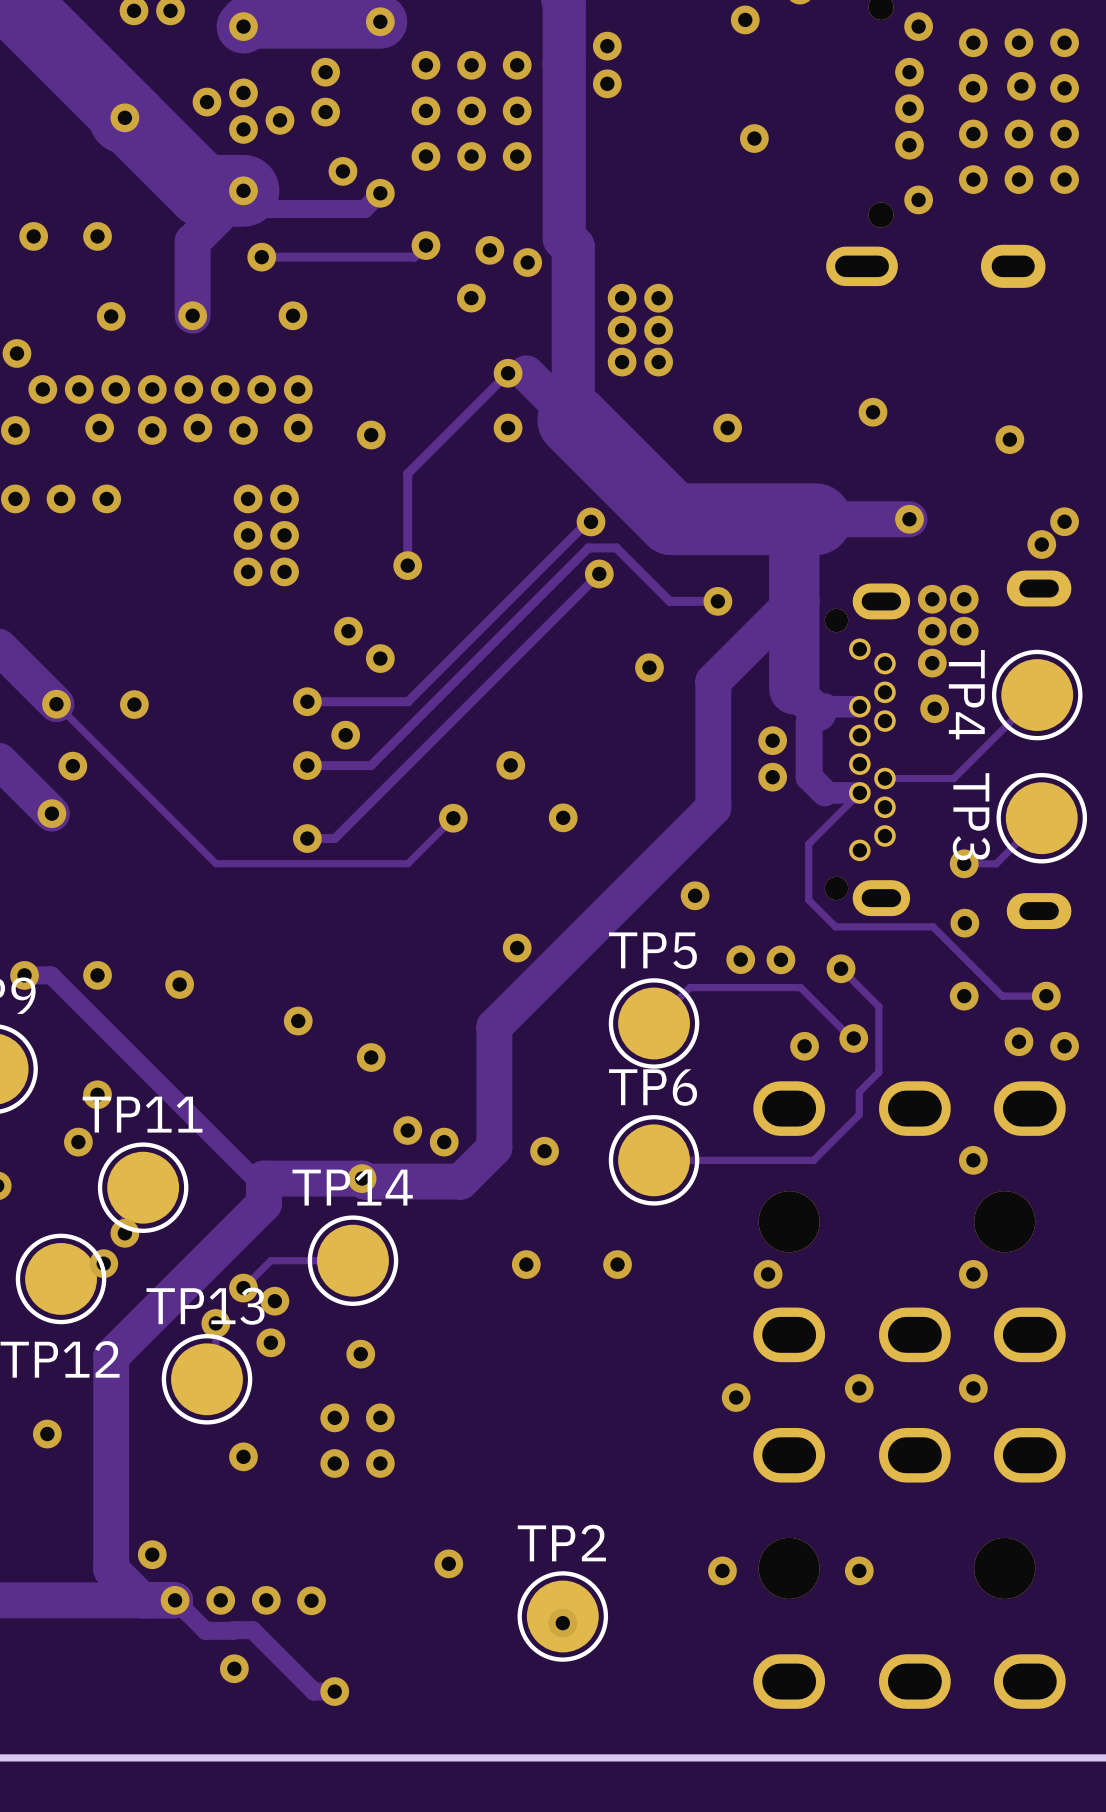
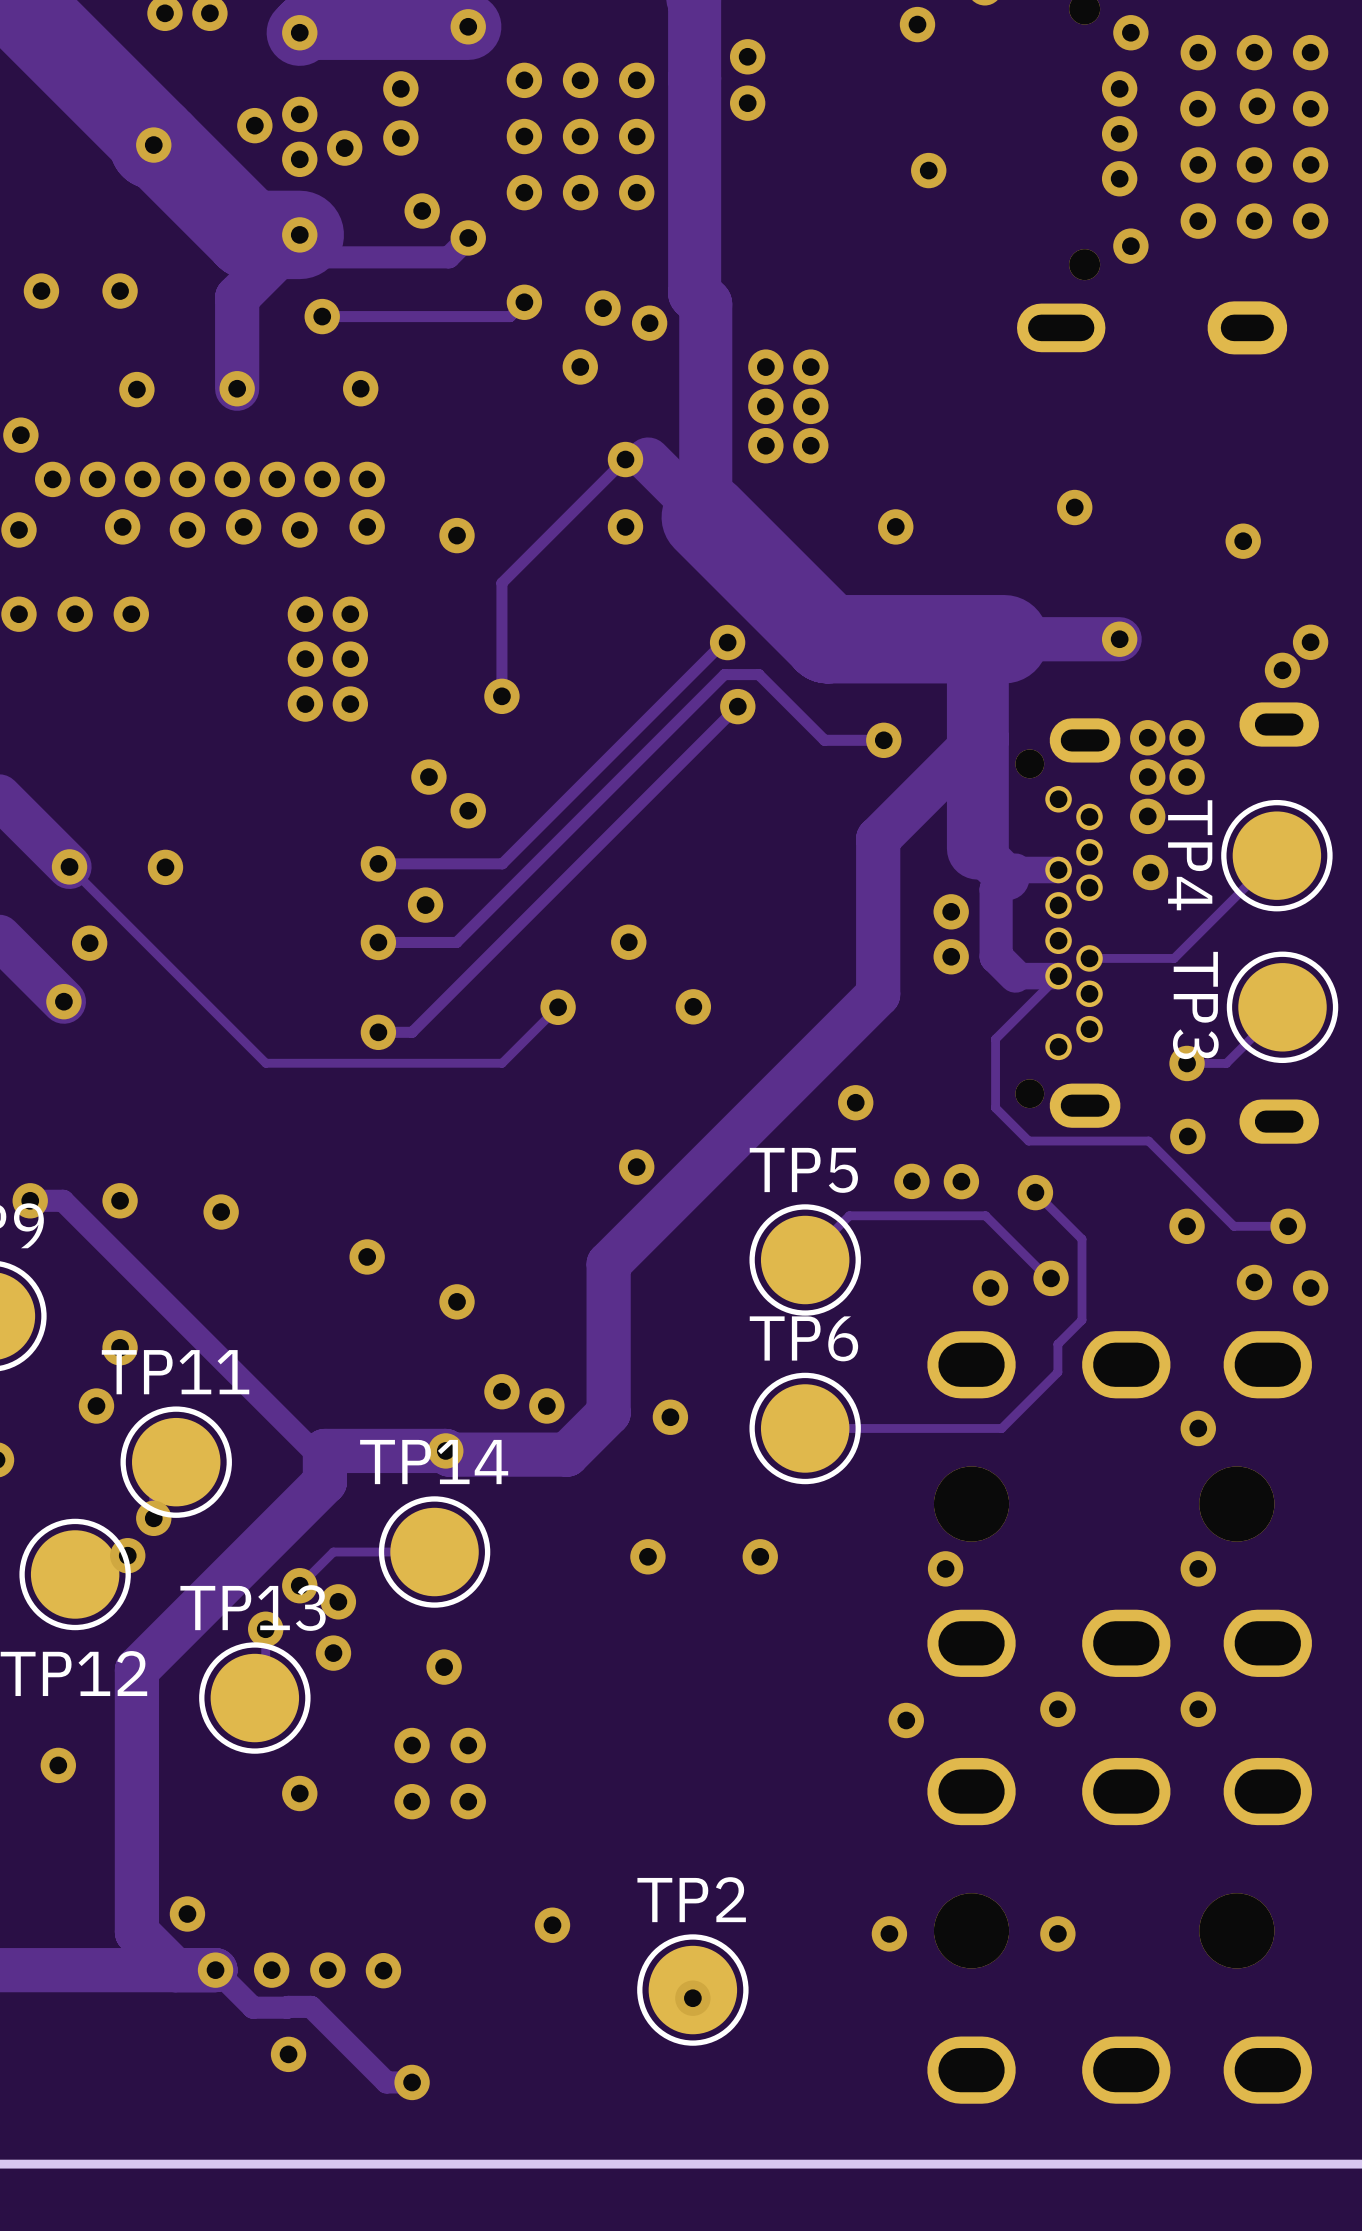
via: (649, 667) -> none

